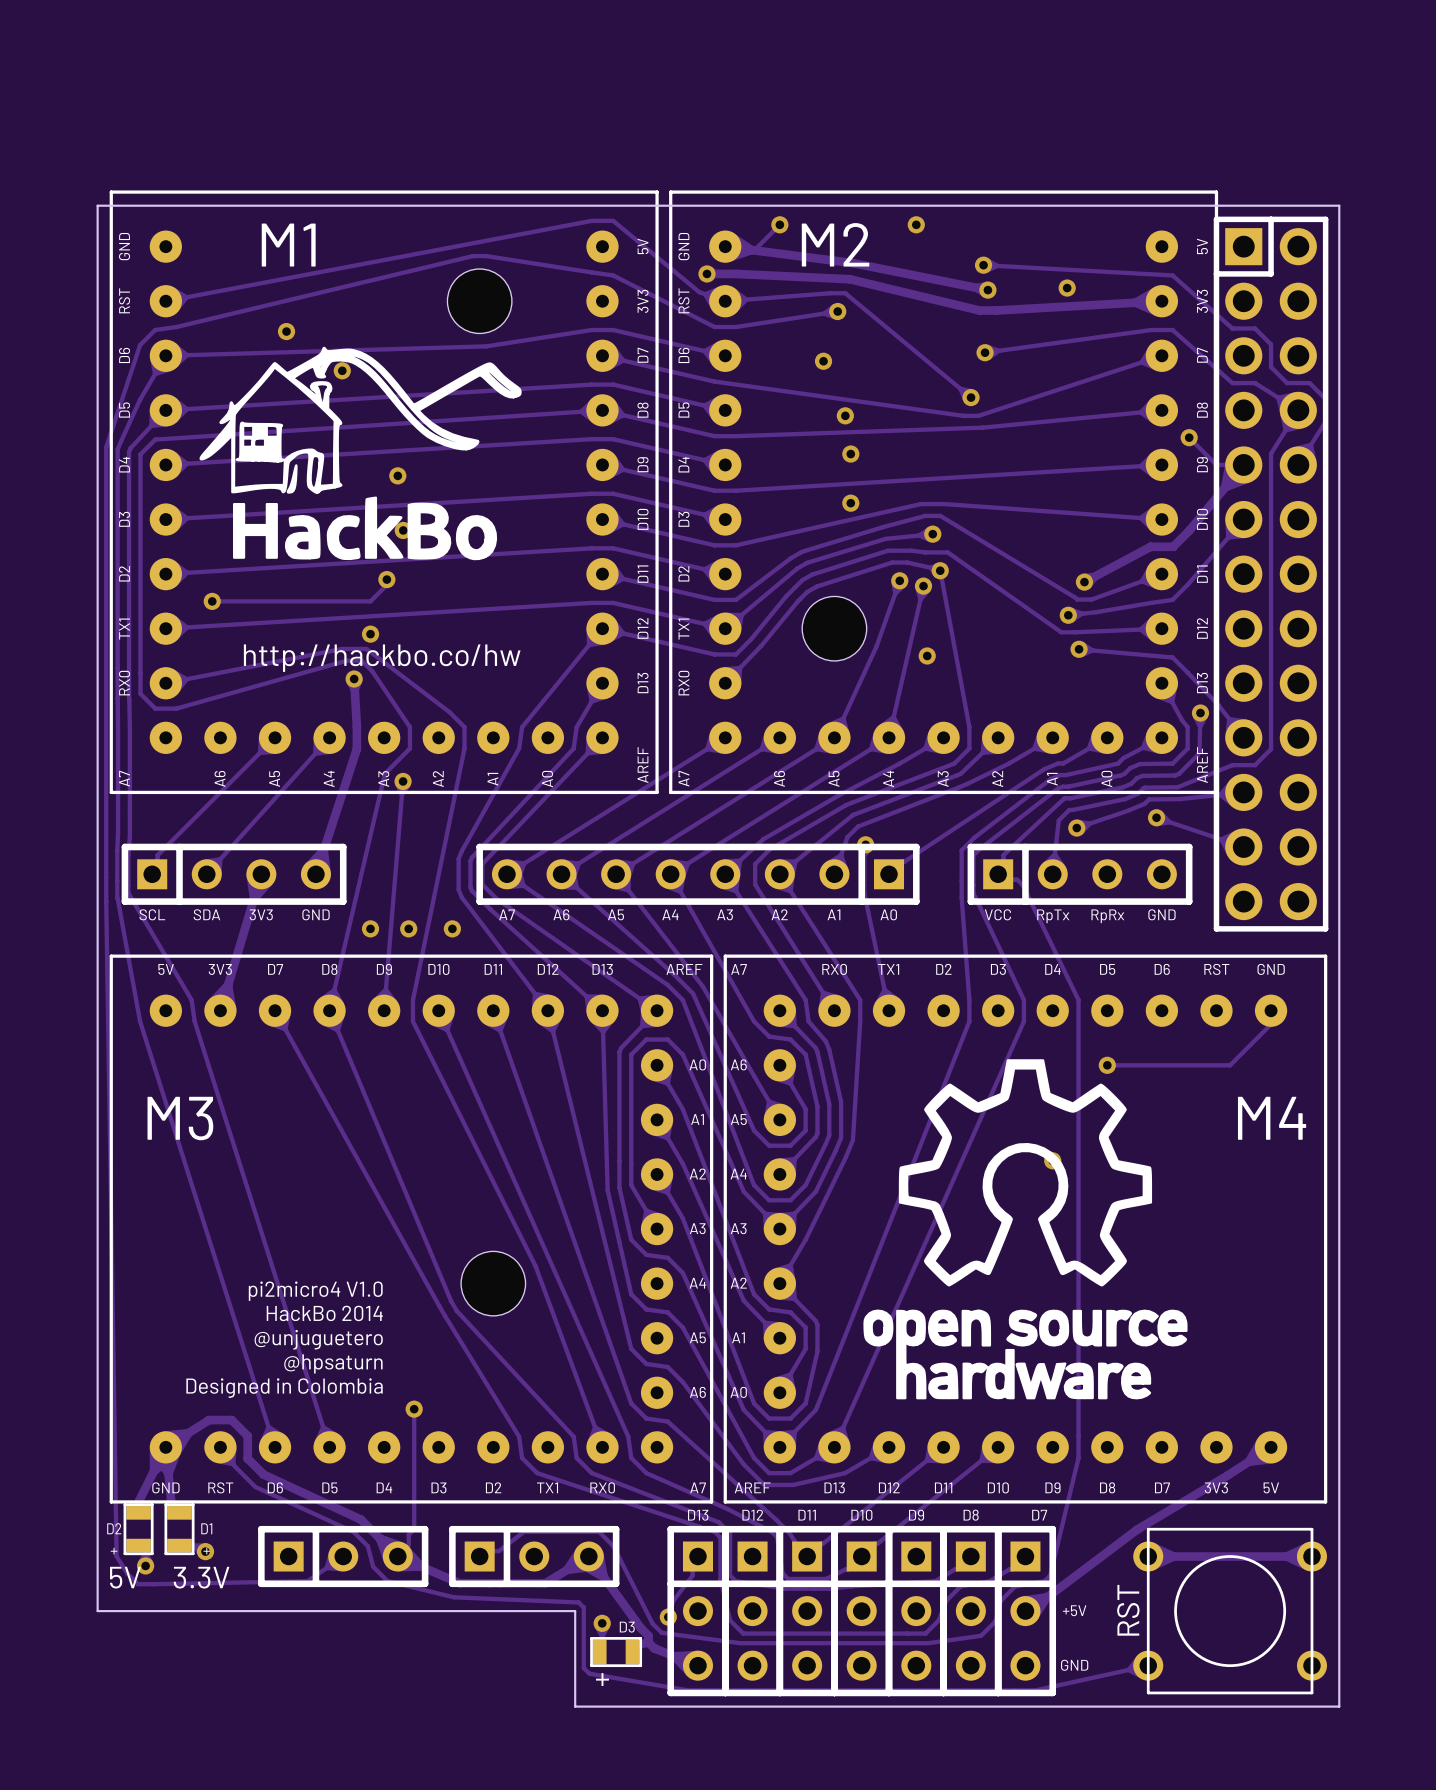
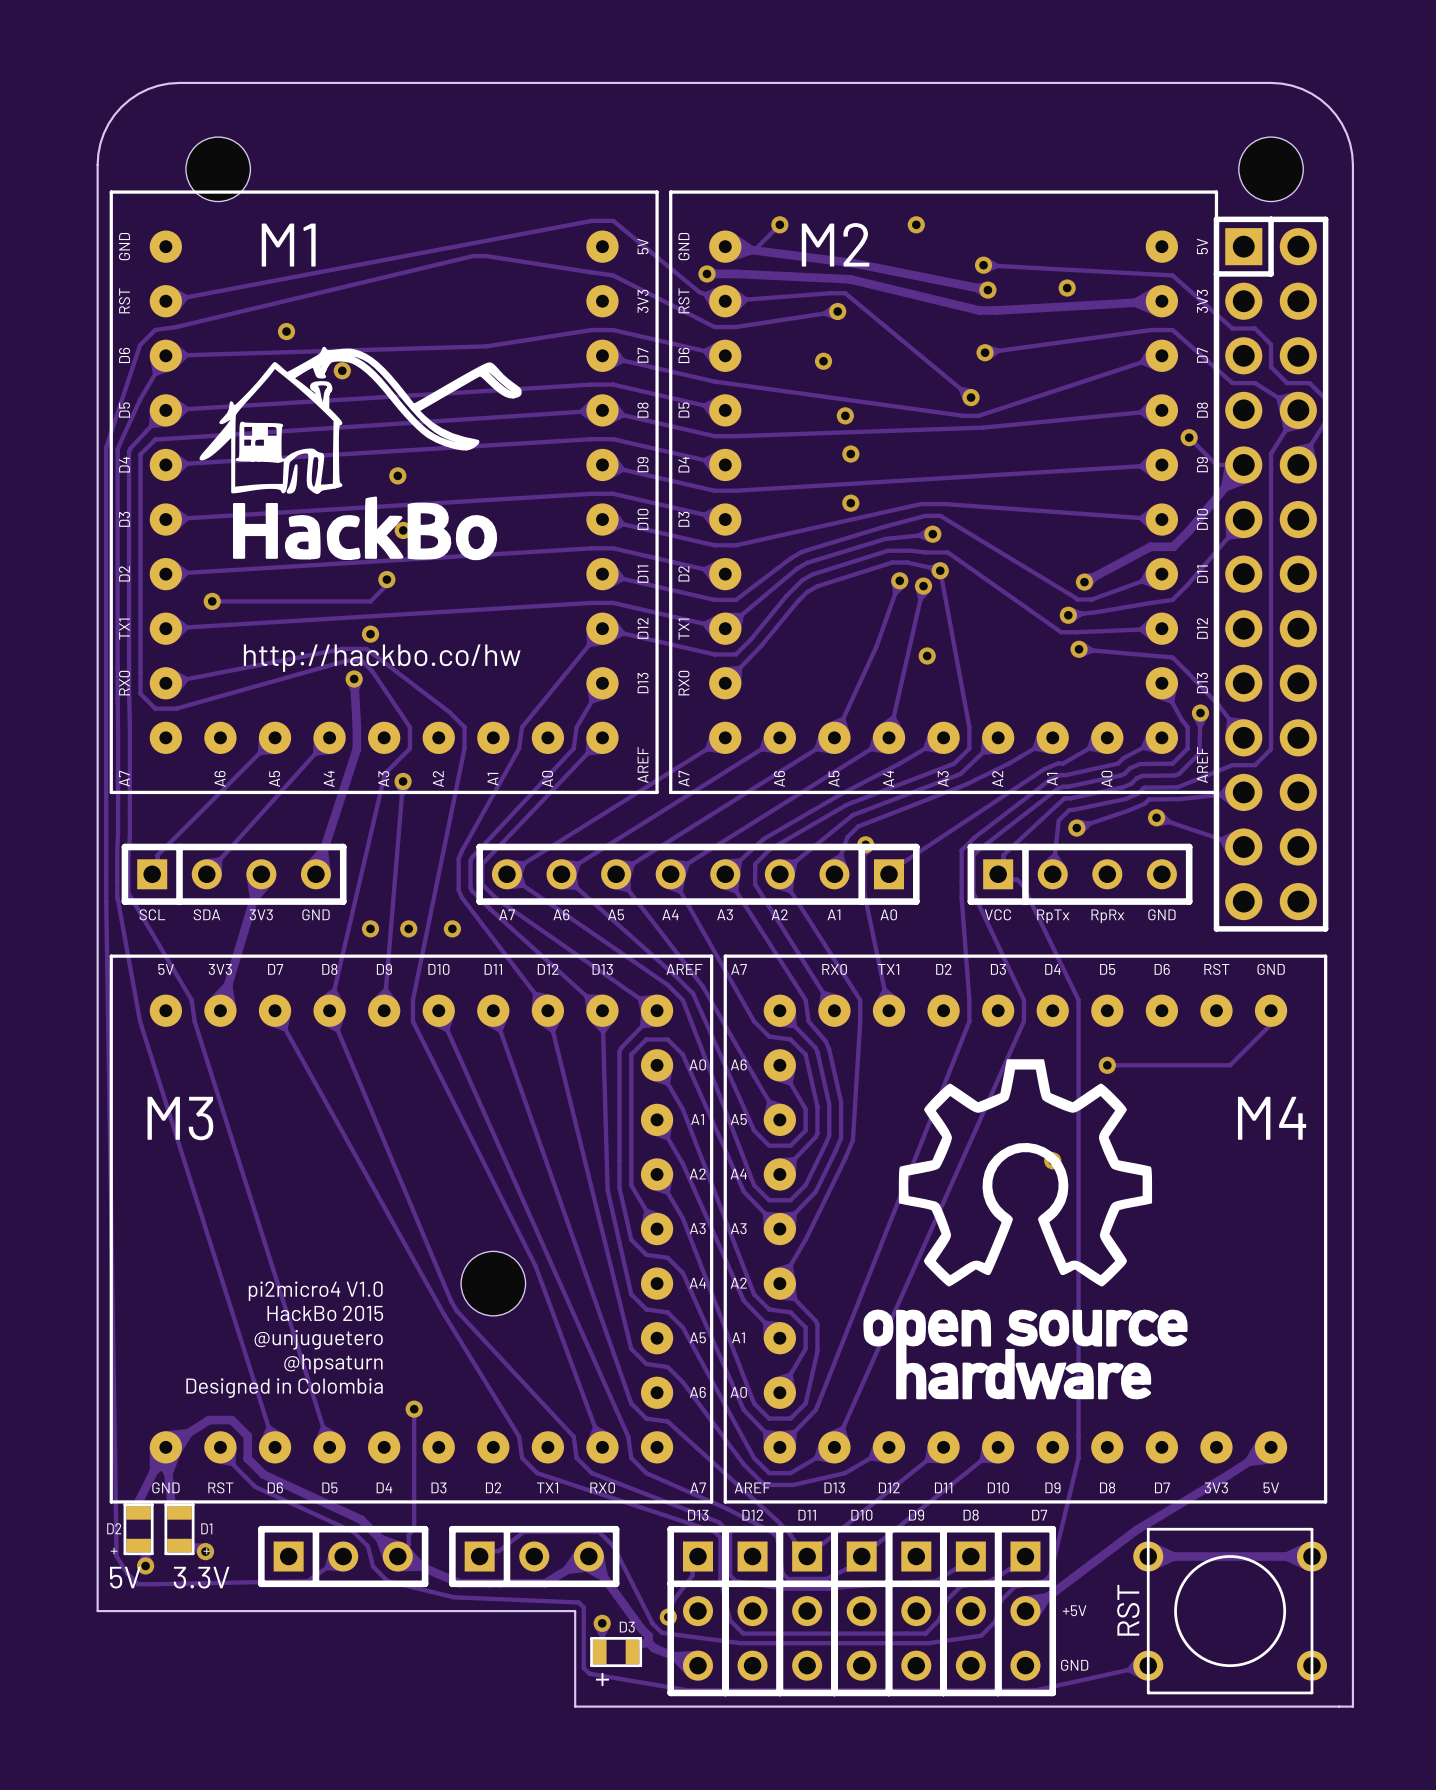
part: none -> (1271, 169)
board edge: (97, 205) (1339, 205) (1339, 1706) -> (97, 205) (98, 154) (108, 123) (121, 106) (138, 93) (168, 83) (1271, 82) (1302, 89) (1320, 99) (1336, 114) (1350, 143) (1352, 164) (1352, 1706) (1339, 1706)
part position: (479, 301) -> (218, 169)
part: (834, 628) -> none
text: HackBo 2014 (324, 1313) -> HackBo 2015 (325, 1313)

